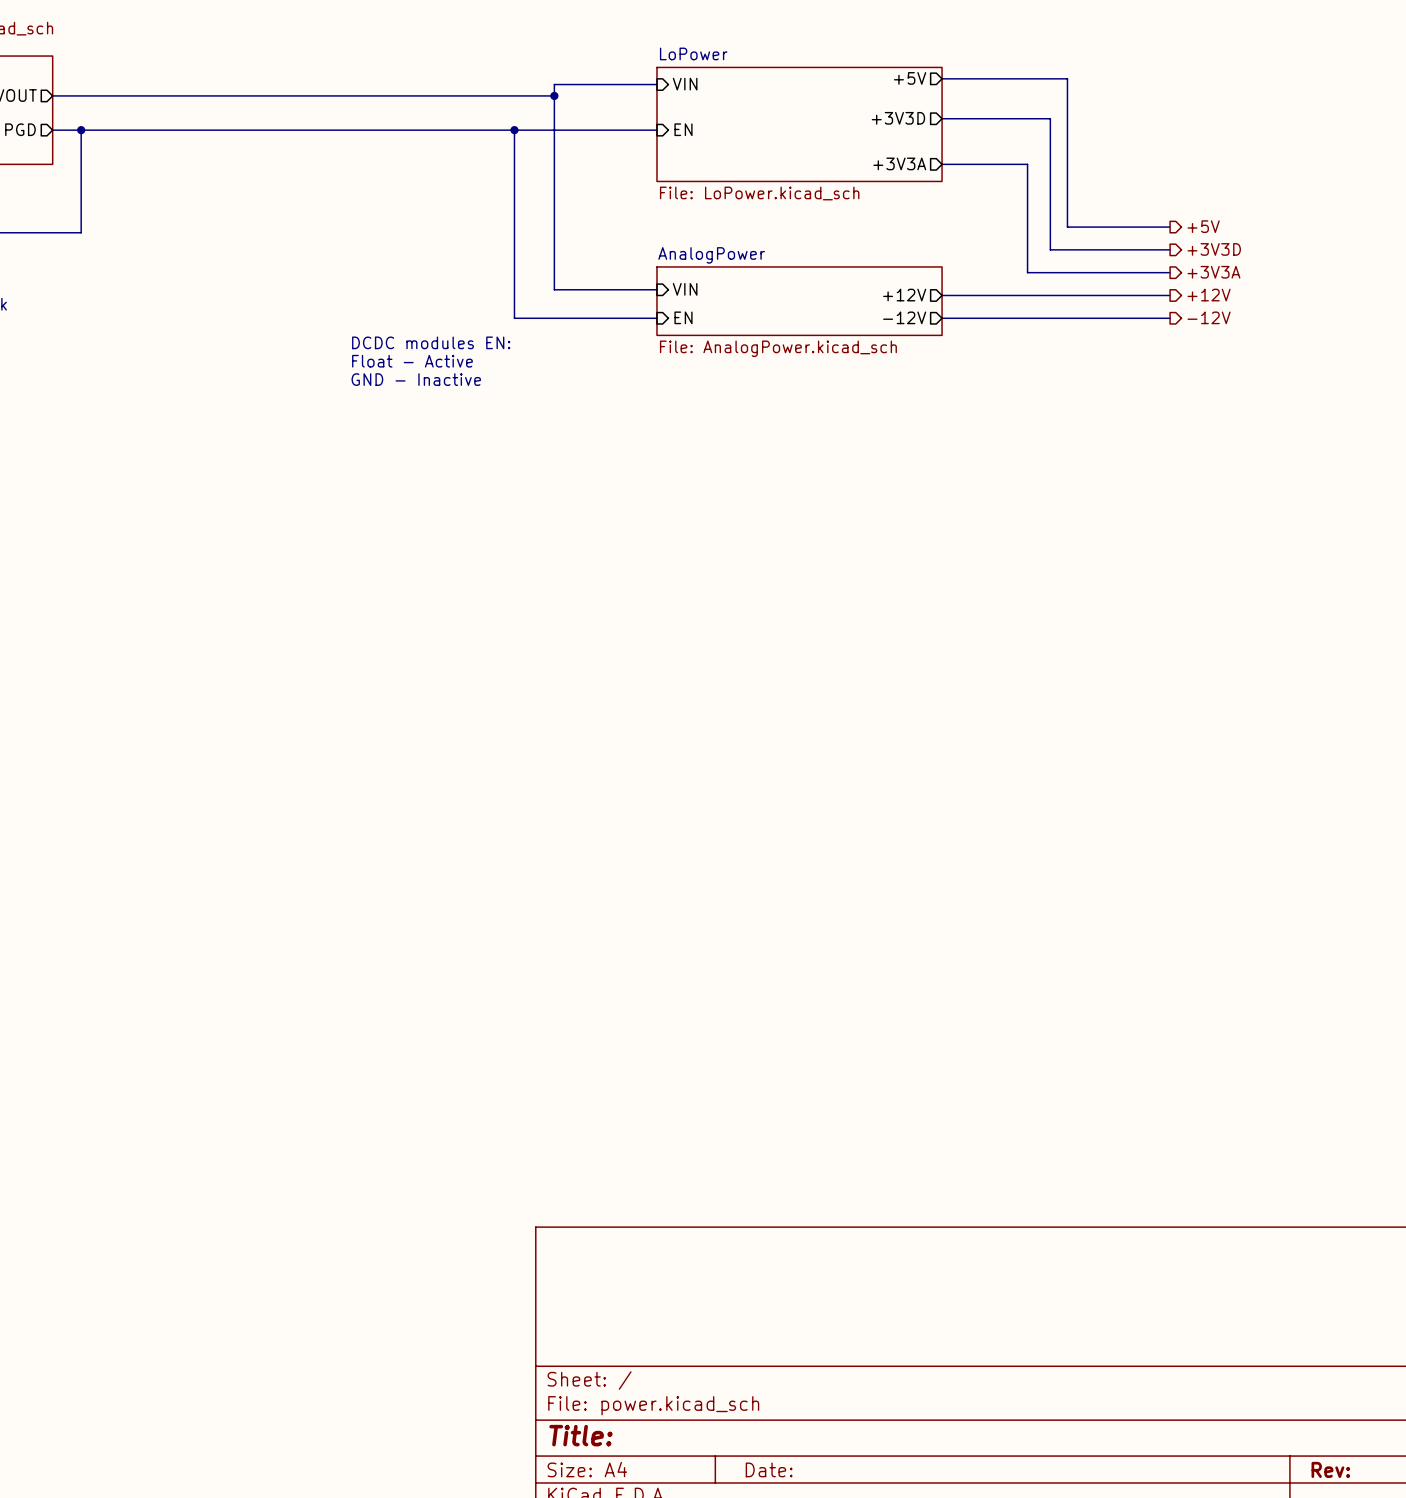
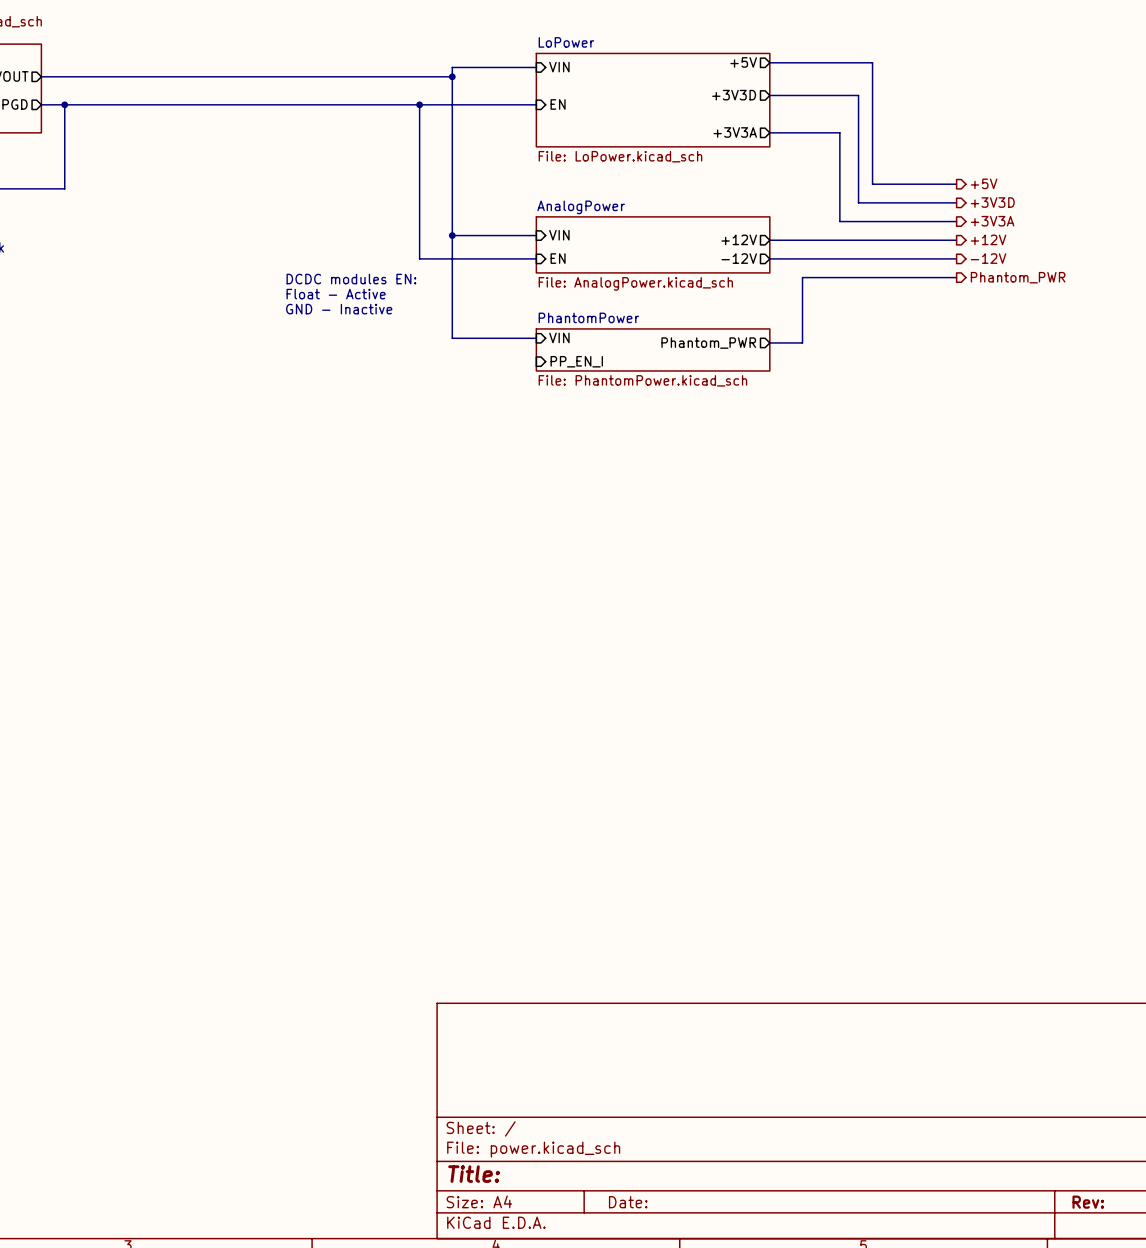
wire: none -> (452, 235) (452, 338) (536, 338)
junction: none -> (452, 235)
wire: none -> (956, 277) (802, 277) (802, 342) (769, 342)
hierarchical label: none -> Phantom_PWR (1018, 277)
sheet pin: none -> VIN (559, 337)
sheet pin: none -> Phantom_PWR (708, 343)
sheet PhantomPower: none -> File: PhantomPower.kicad_sch (653, 349)
sheet pin: none -> PP_EN_I (576, 361)

